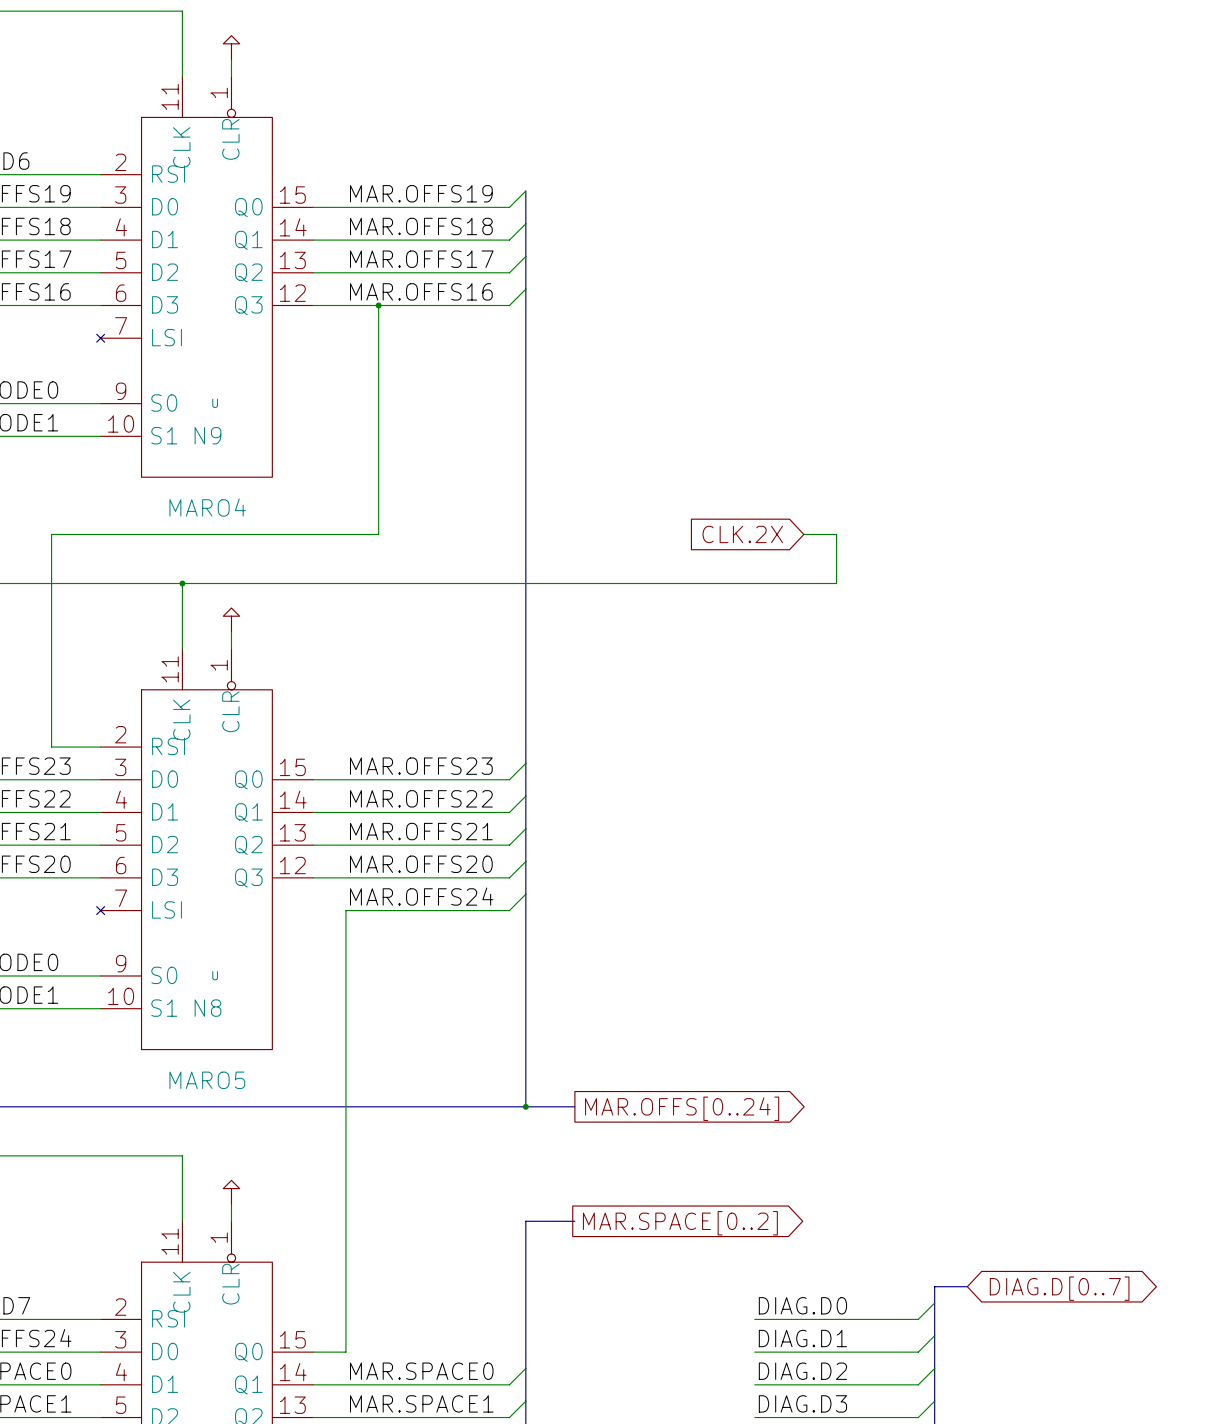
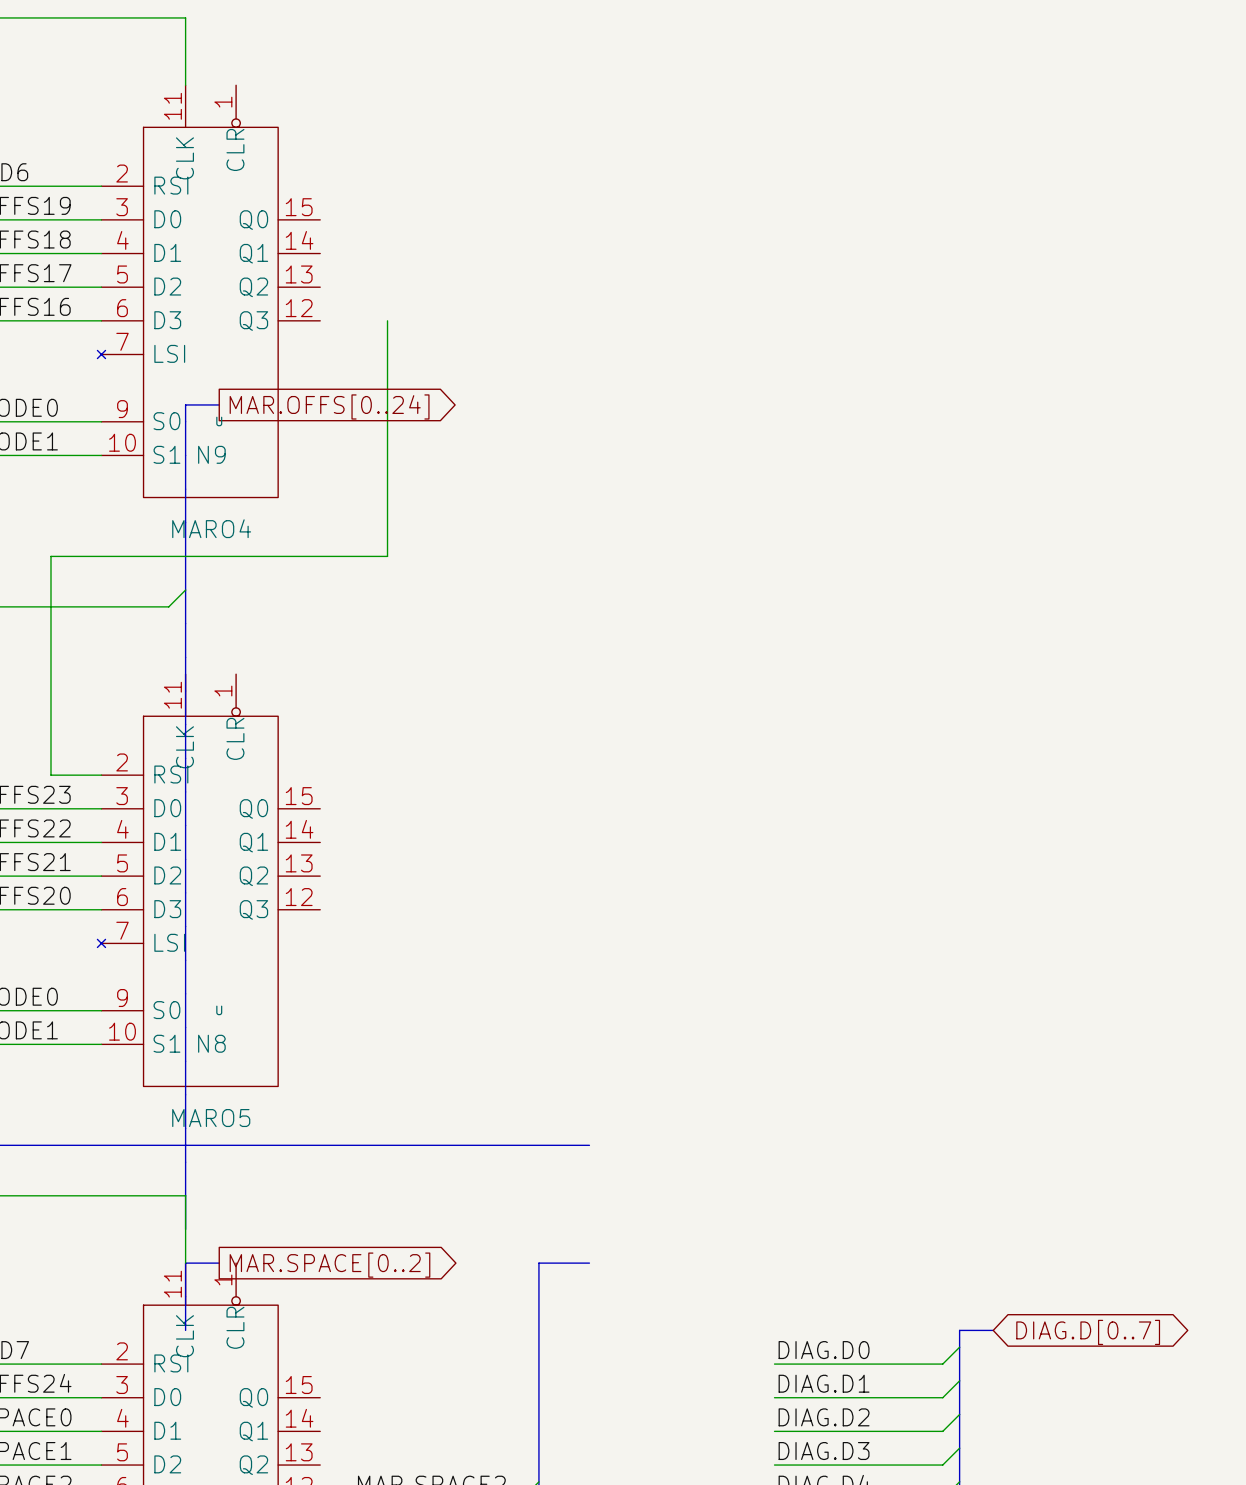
power symbol: (231, 47) -> none
wire: (231, 60) (231, 76) -> none
wire: (525, 191) (509, 207) (313, 207) -> none
bus: (525, 191) (525, 1106) -> none
label: MAR.OFFS19 (421, 193) -> none
wire: (525, 223) (509, 240) (313, 240) -> none
label: MAR.OFFS18 (421, 226) -> none
wire: (525, 256) (509, 272) (313, 272) -> none
label: MAR.OFFS17 (421, 259) -> none
wire: (525, 289) (509, 305) (313, 305) -> none
label: MAR.OFFS16 (421, 291) -> none
junction: (378, 305) -> none
bus: none -> (219, 404) (185, 404) (185, 1229)
global label: none -> MAR.OFFS[0..24] (329, 406)
global label: CLK.2X (742, 534) -> none
wire: (803, 534) (836, 534) (836, 583) (166, 583) -> (185, 590) (168, 606)
junction: (182, 583) -> none
power symbol: (231, 620) -> none
wire: (231, 632) (231, 648) -> none
wire: (525, 763) (509, 779) (313, 779) -> none
label: MAR.OFFS23 (421, 766) -> none
wire: (525, 796) (509, 812) (313, 812) -> none
label: MAR.OFFS22 (421, 798) -> none
wire: (525, 828) (509, 845) (313, 845) -> none
label: MAR.OFFS21 (421, 831) -> none
wire: (525, 861) (509, 877) (313, 877) -> none
label: MAR.OFFS20 (421, 864) -> none
wire: (525, 894) (509, 910) (345, 910) (345, 1352) (313, 1352) -> none
label: MAR.OFFS24 (421, 896) -> none
junction: (525, 1106) -> none
global label: MAR.OFFS[0..24] (682, 1108) -> none
power symbol: (231, 1192) -> none
wire: (231, 1204) (231, 1221) -> none
bus: none -> (219, 1263) (185, 1263) (185, 1330)
global label: none -> MAR.SPACE[0..2] (329, 1265)
global label: MAR.SPACE[0..2] (680, 1223) -> none
wire: (525, 1368) (509, 1384) (313, 1384) -> none
label: MAR.SPACE0 (421, 1371) -> none
wire: (525, 1401) (509, 1417) (313, 1417) -> none
label: MAR.SPACE1 (421, 1403) -> none

